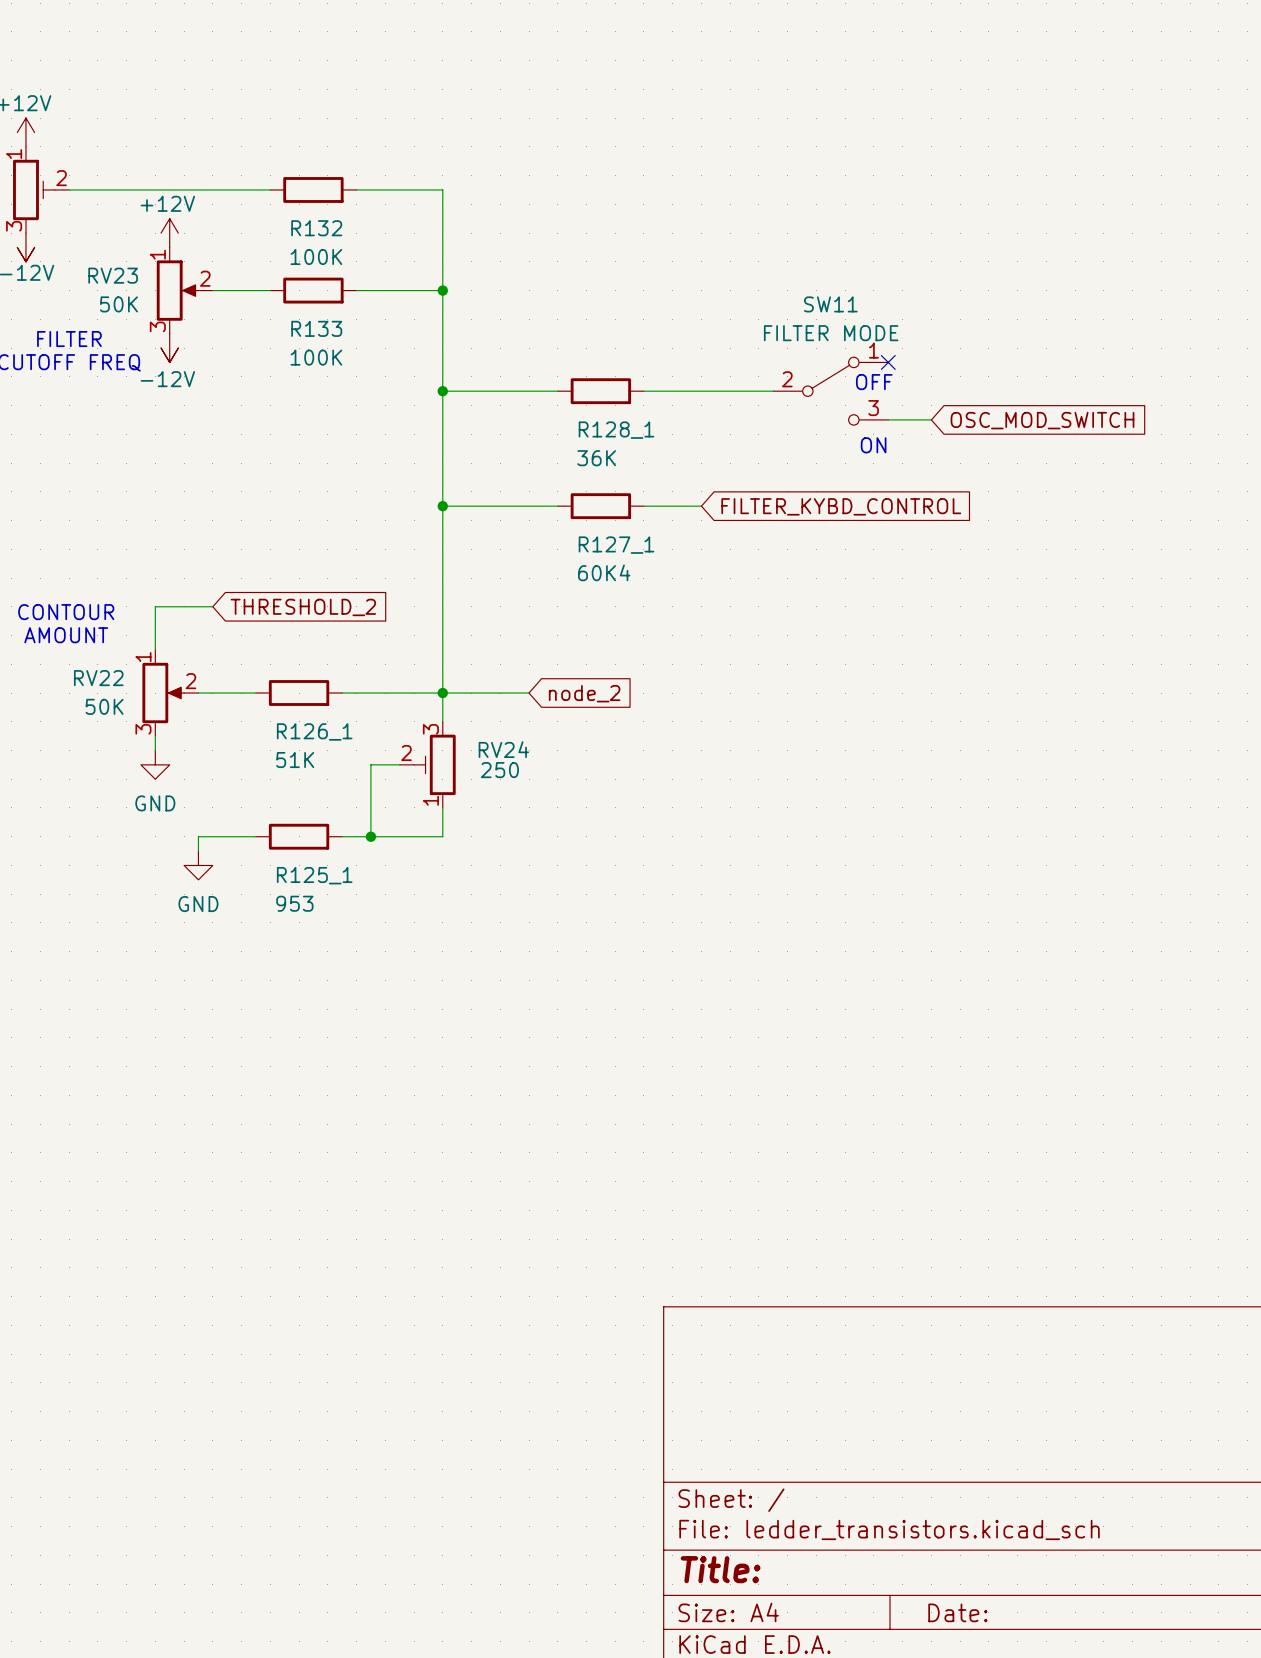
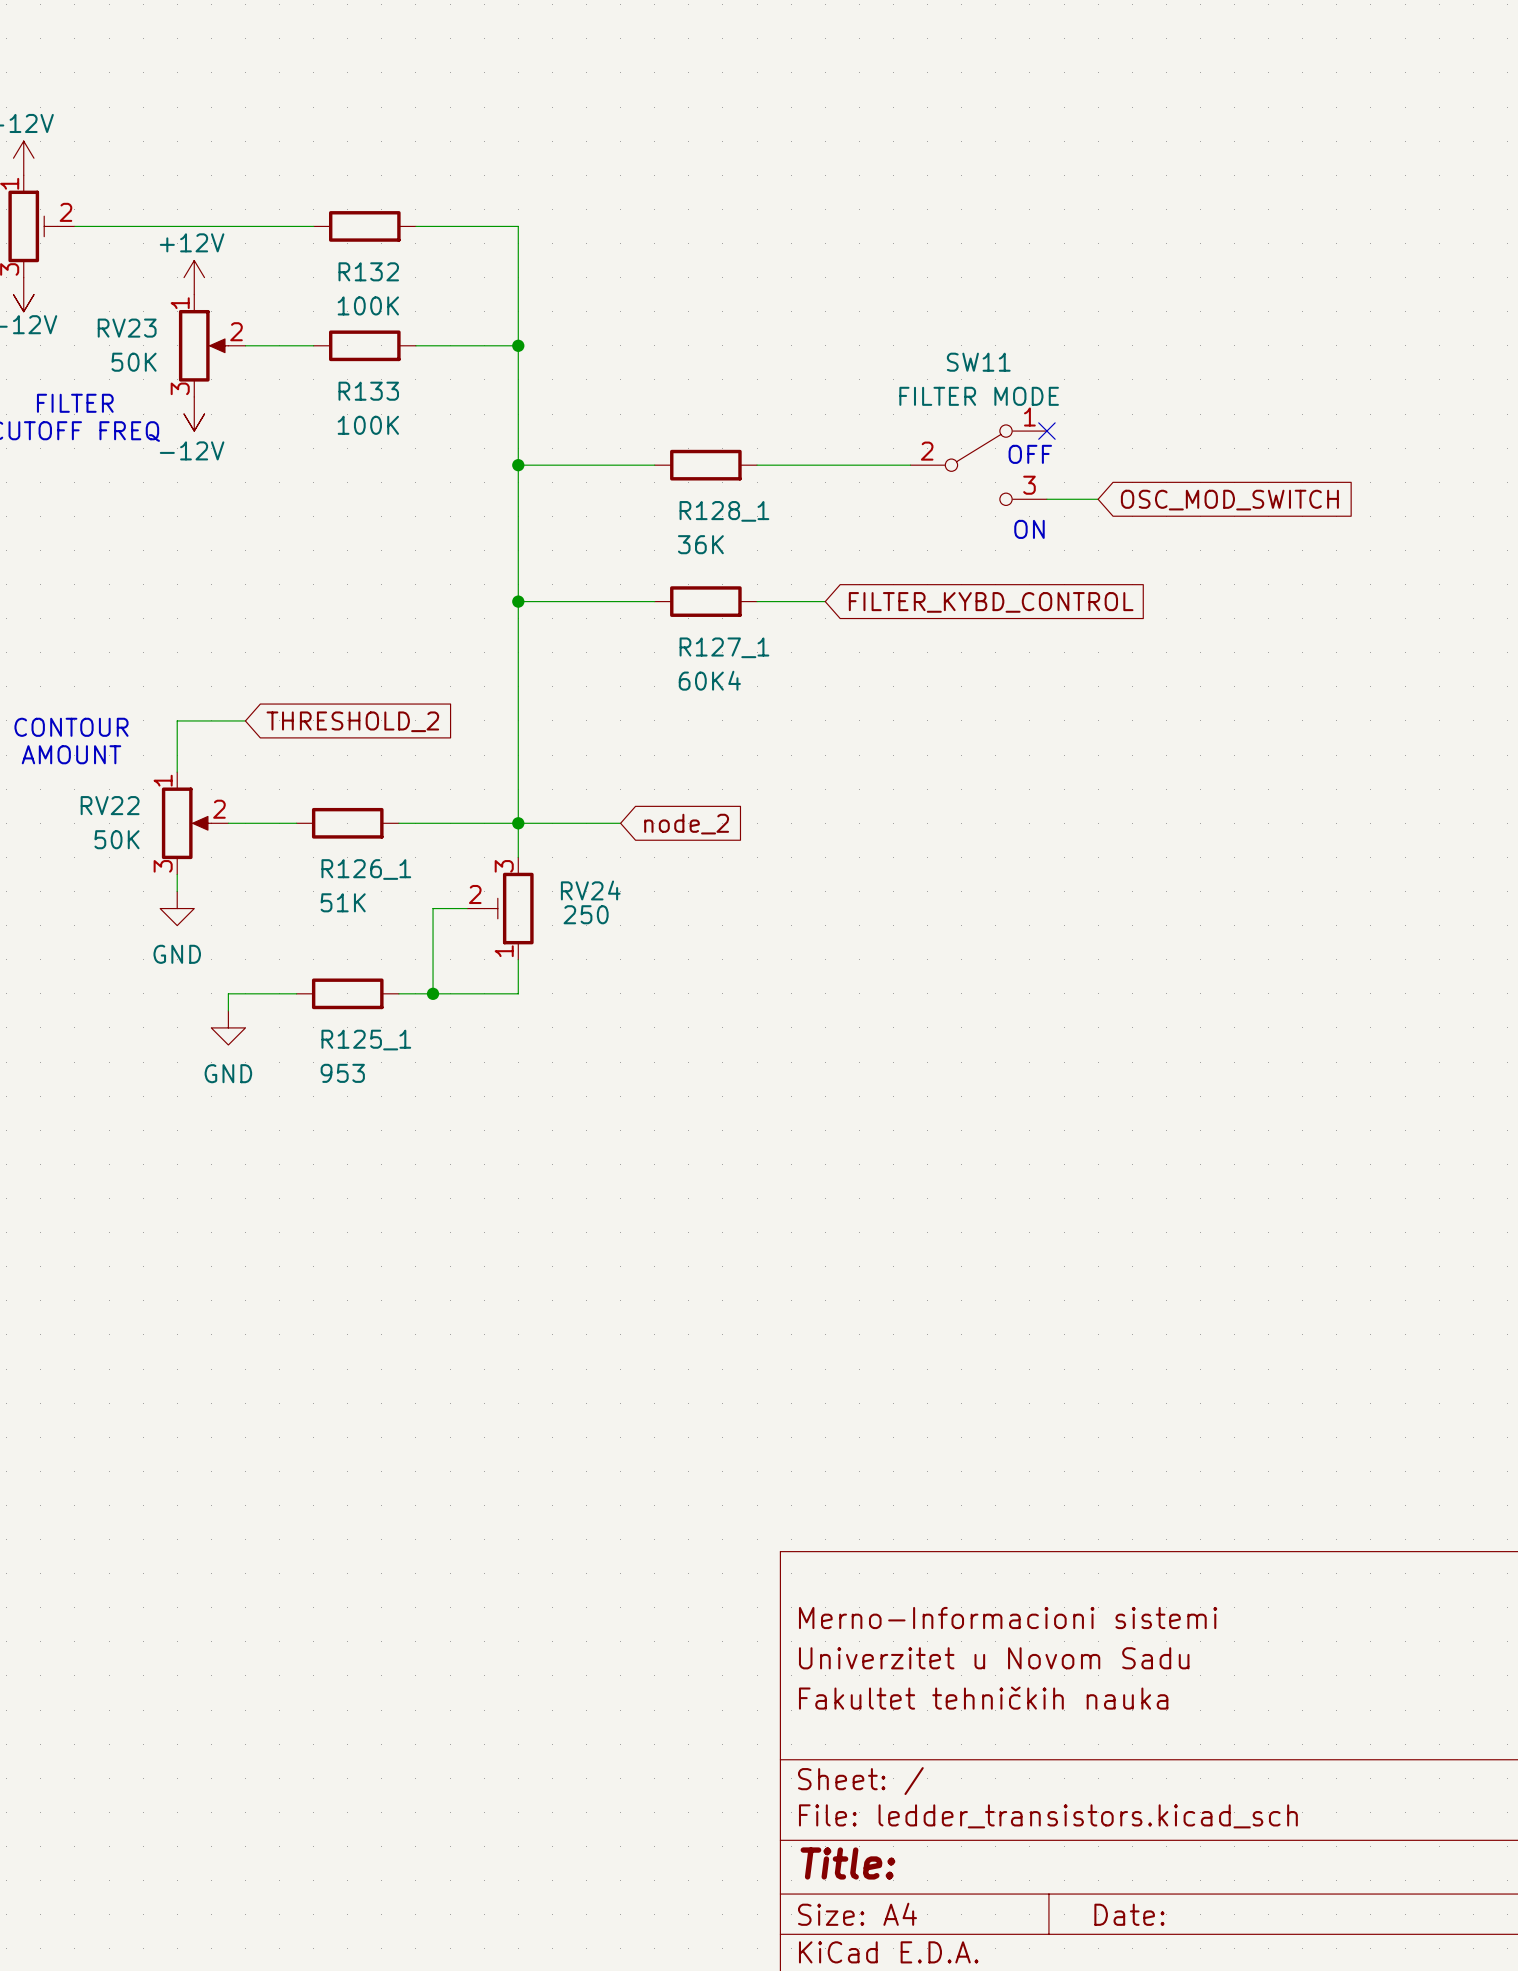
title block: none -> Merno-Informacioni sistemi (1008, 1618)
title block: none -> Univerzitet u Novom Sadu (994, 1658)
title block: none -> Fakultet tehničkih nauka (983, 1698)

